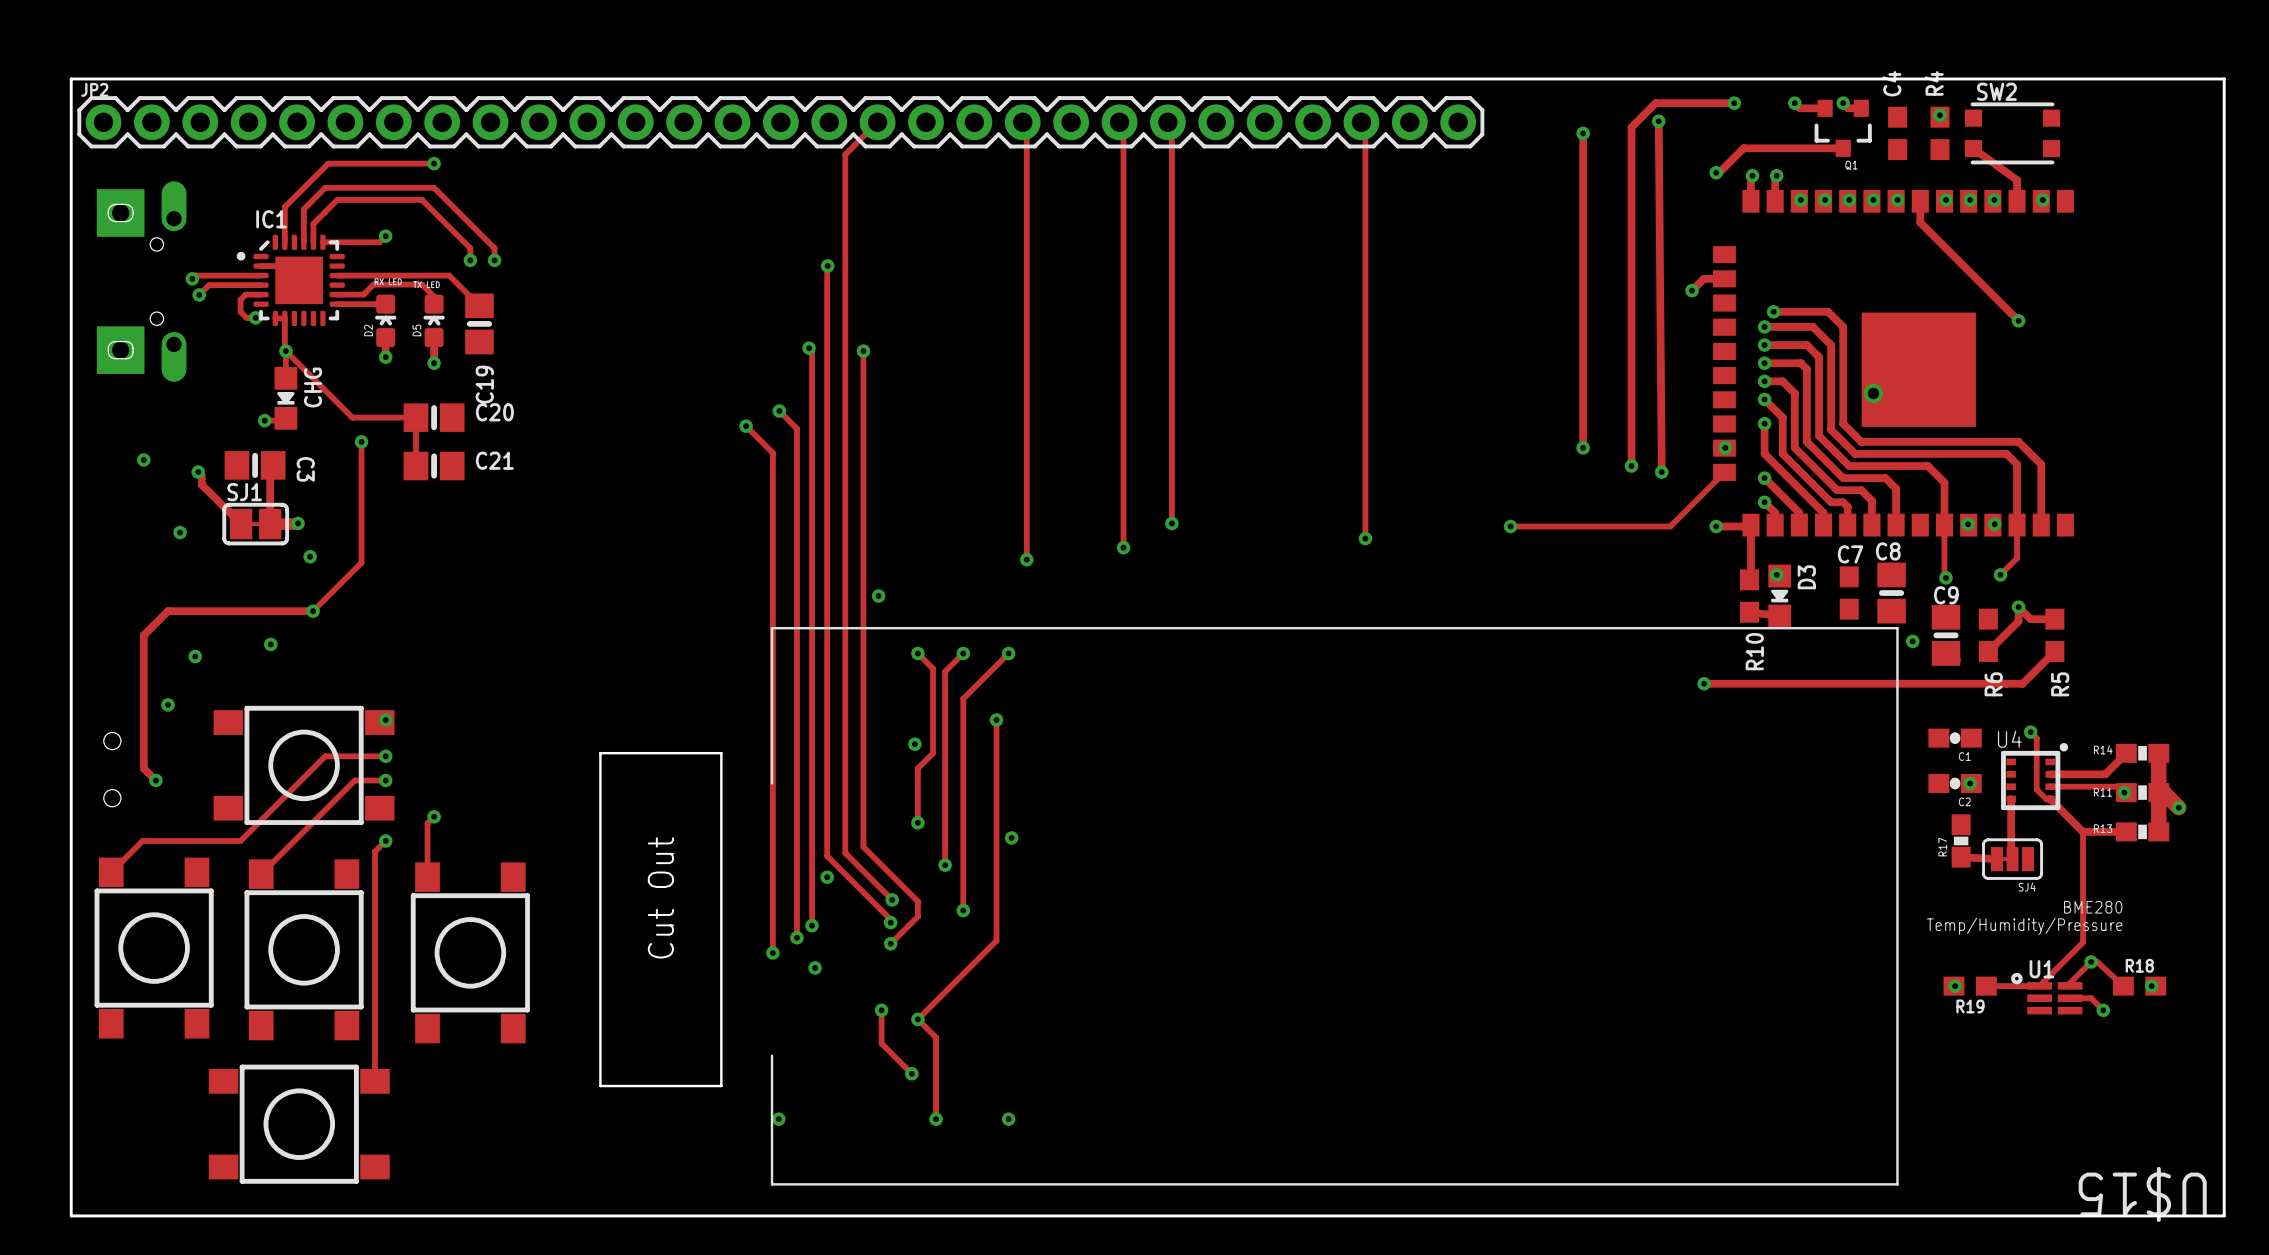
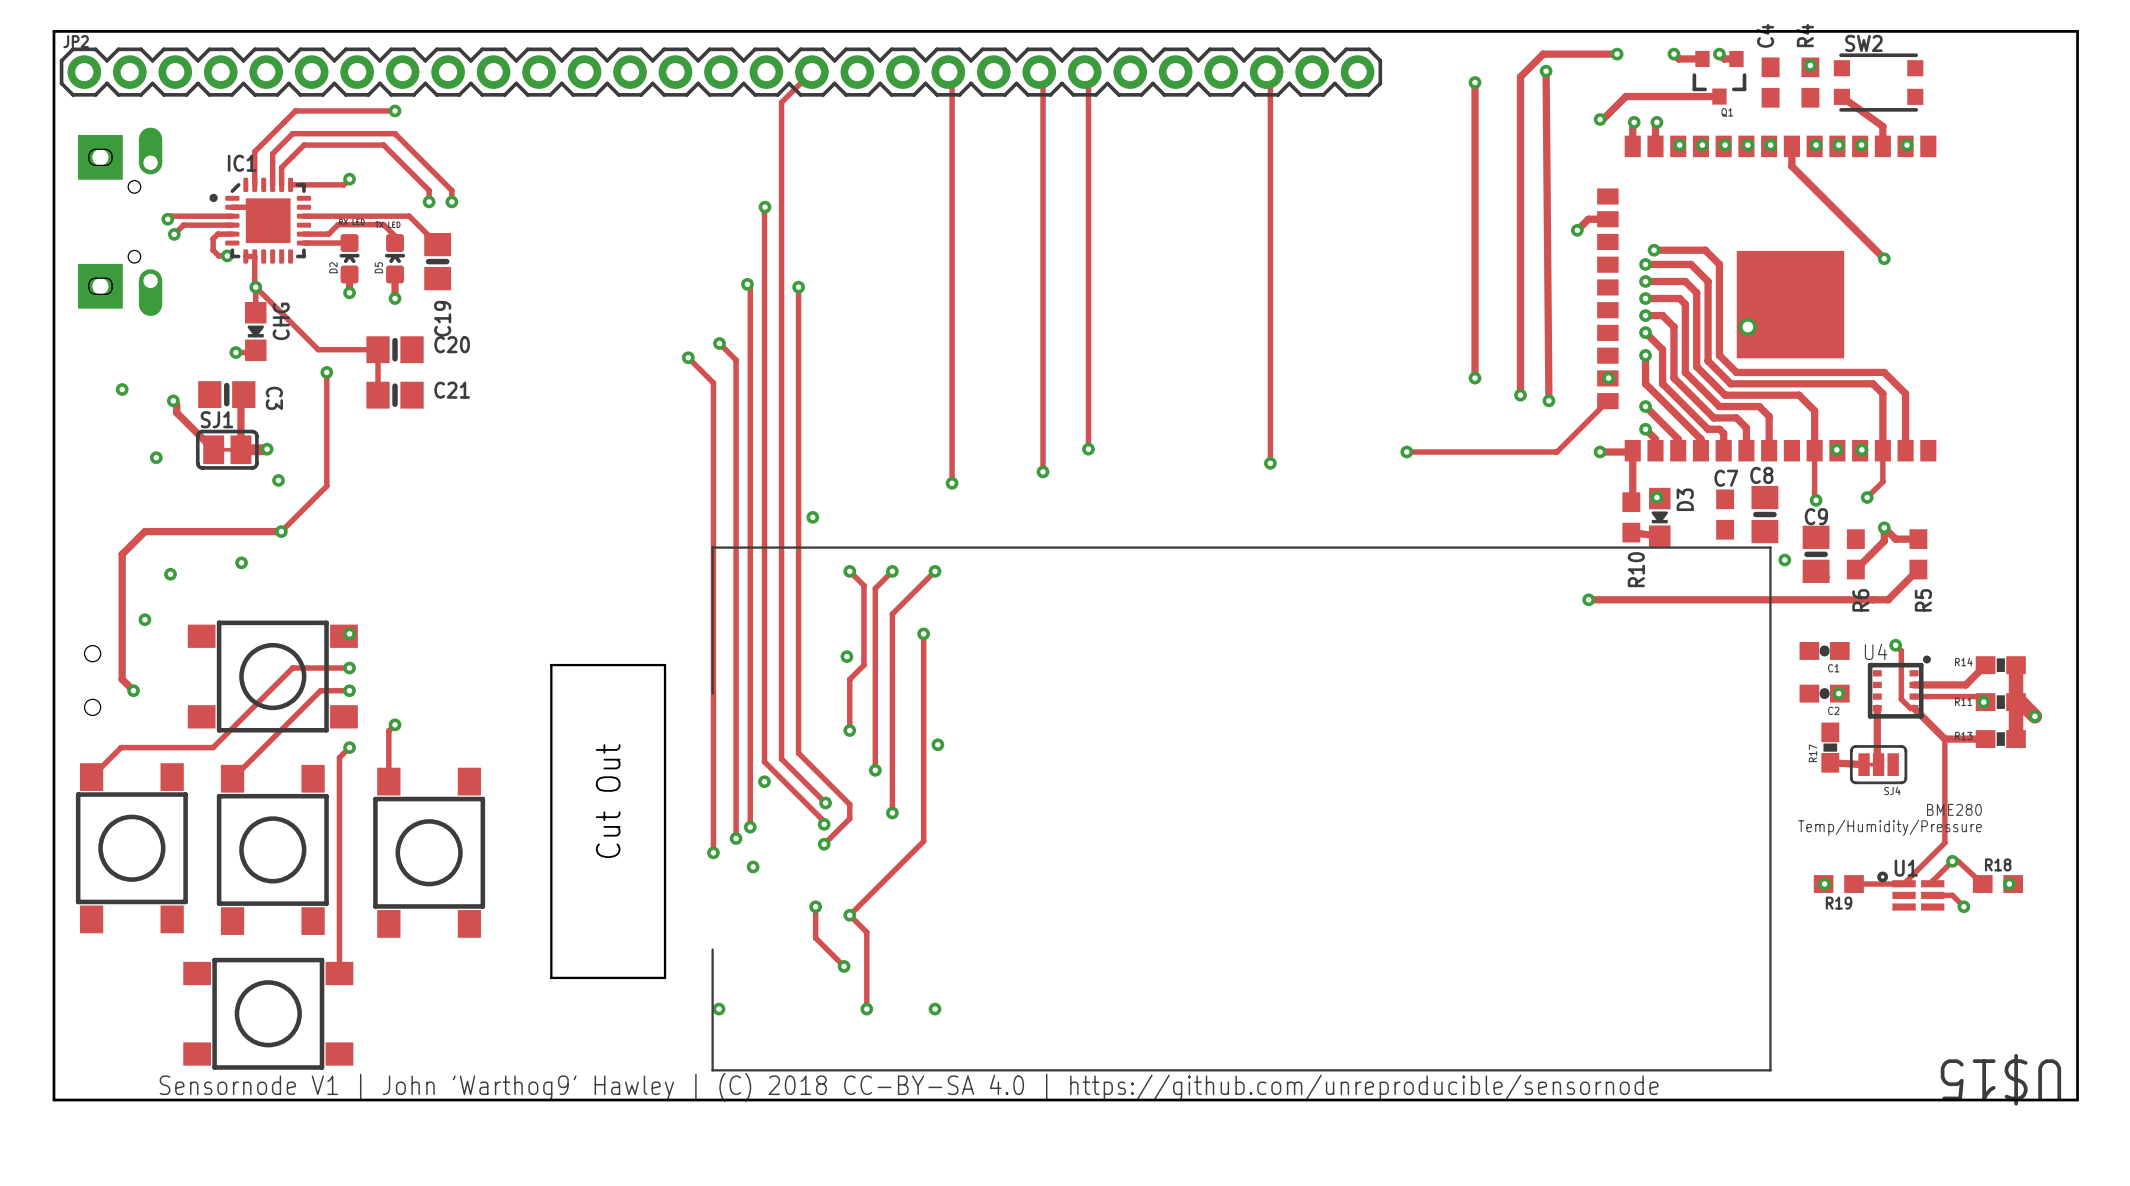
text: none -> Sensornode V1 | John 'Warthog9' Hawley | (C) 2018 CC-BY-SA 4.0 | https://github.com/unreproducible/sensornode (909, 1087)

